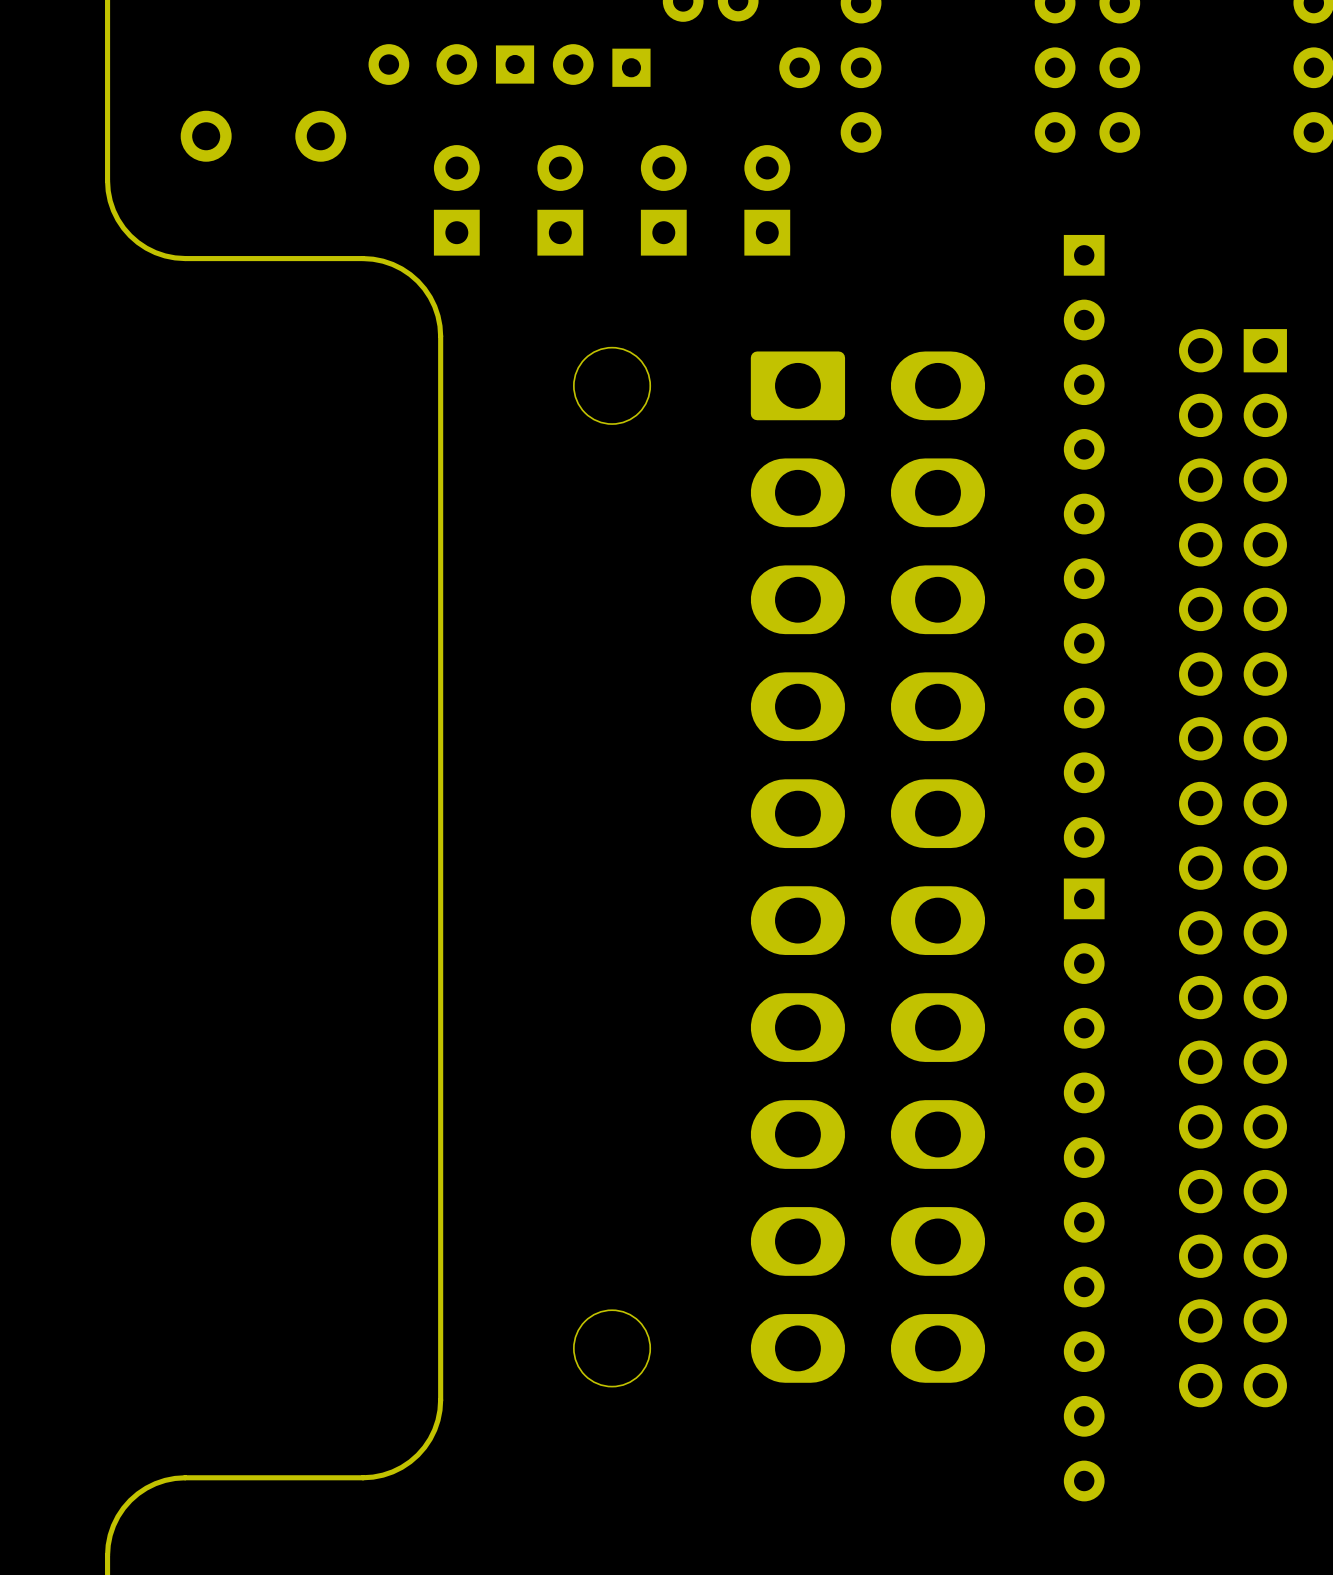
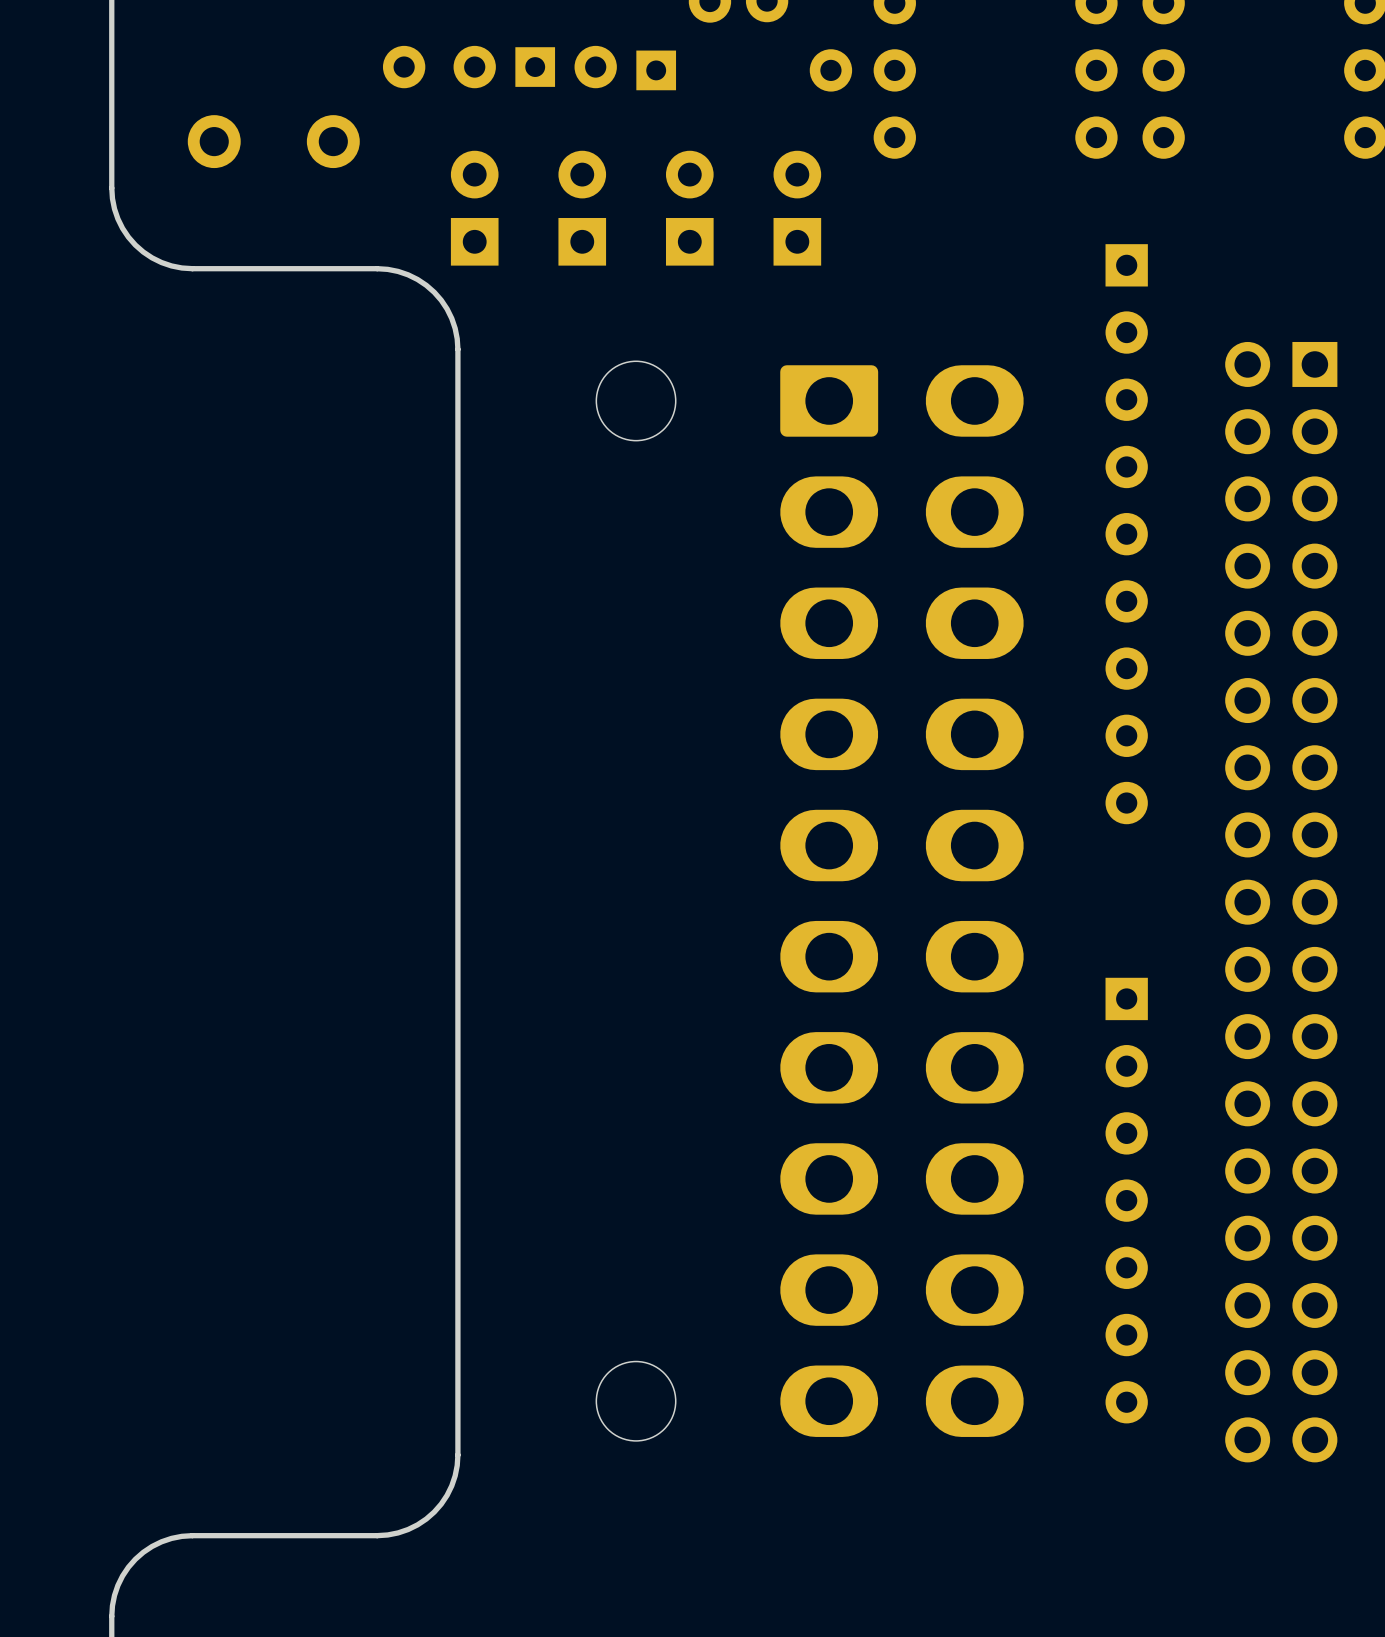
part: (1084, 546) -> none
part: none -> (1126, 1200)
part: (1084, 1189) -> none

